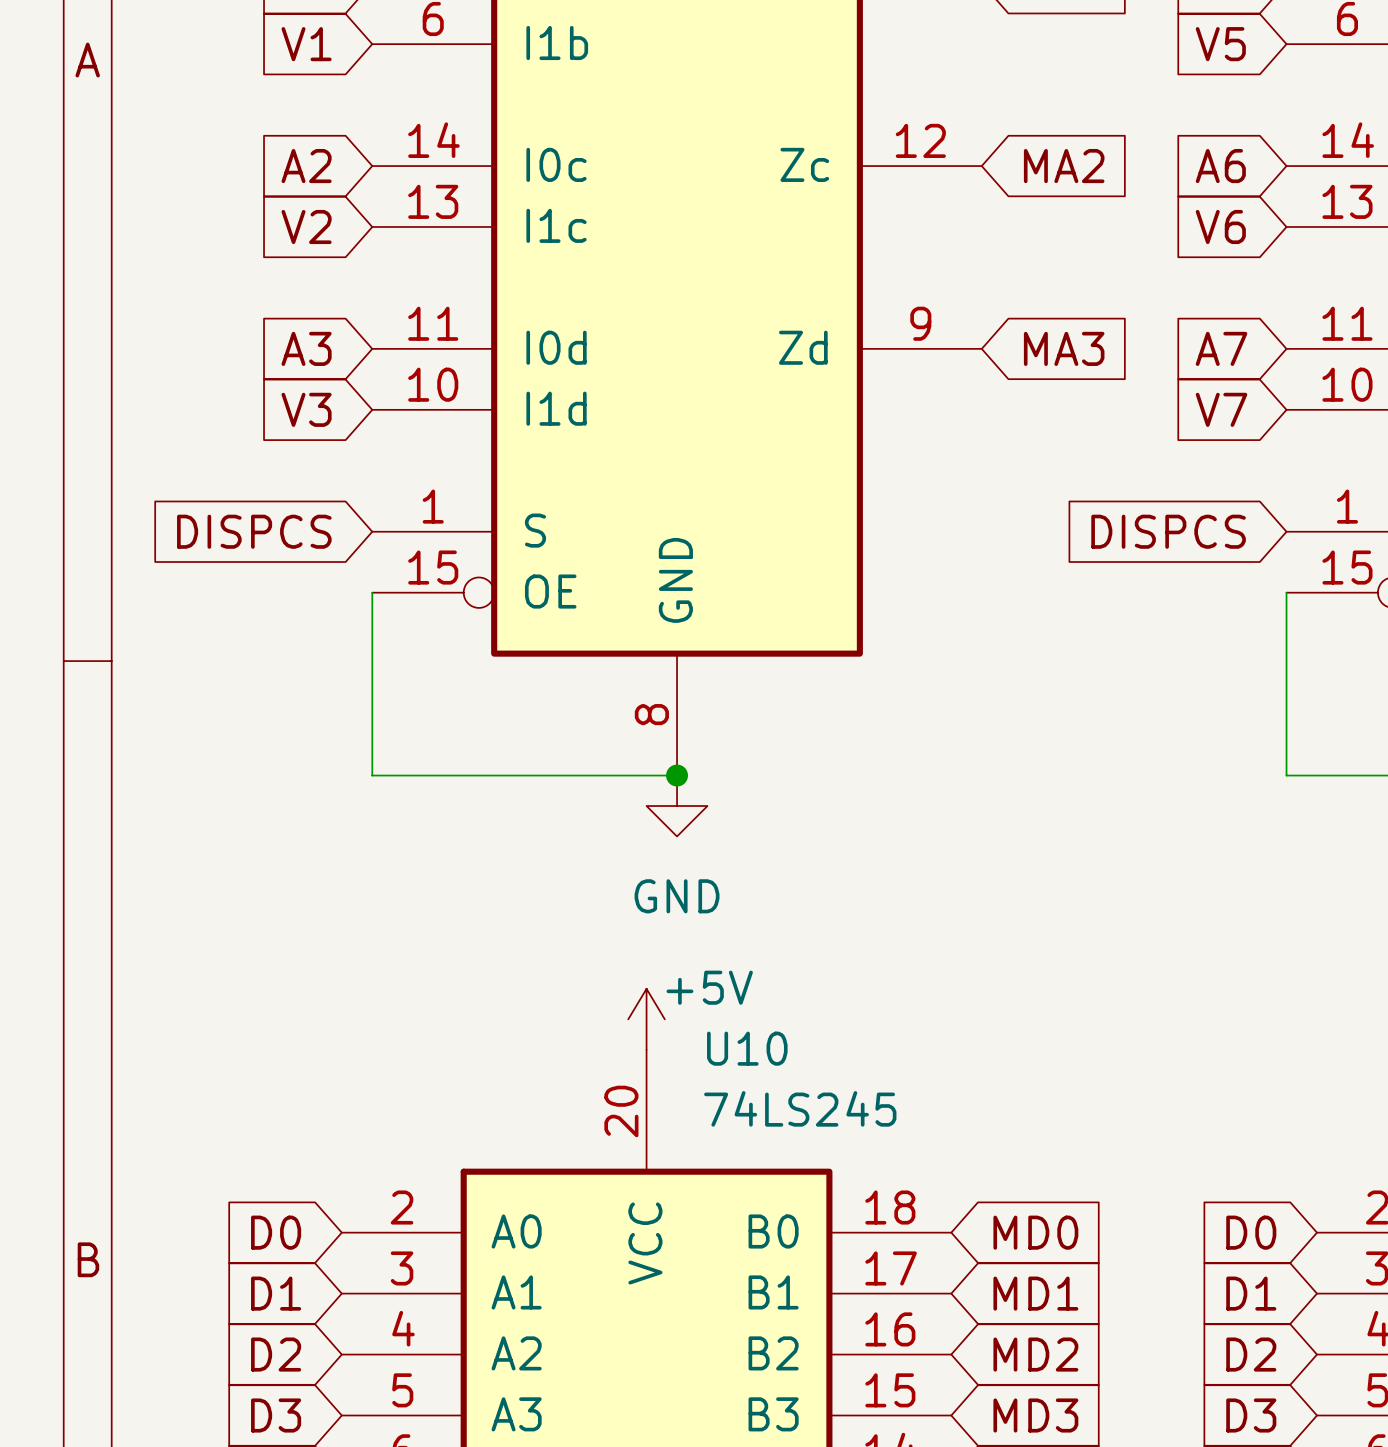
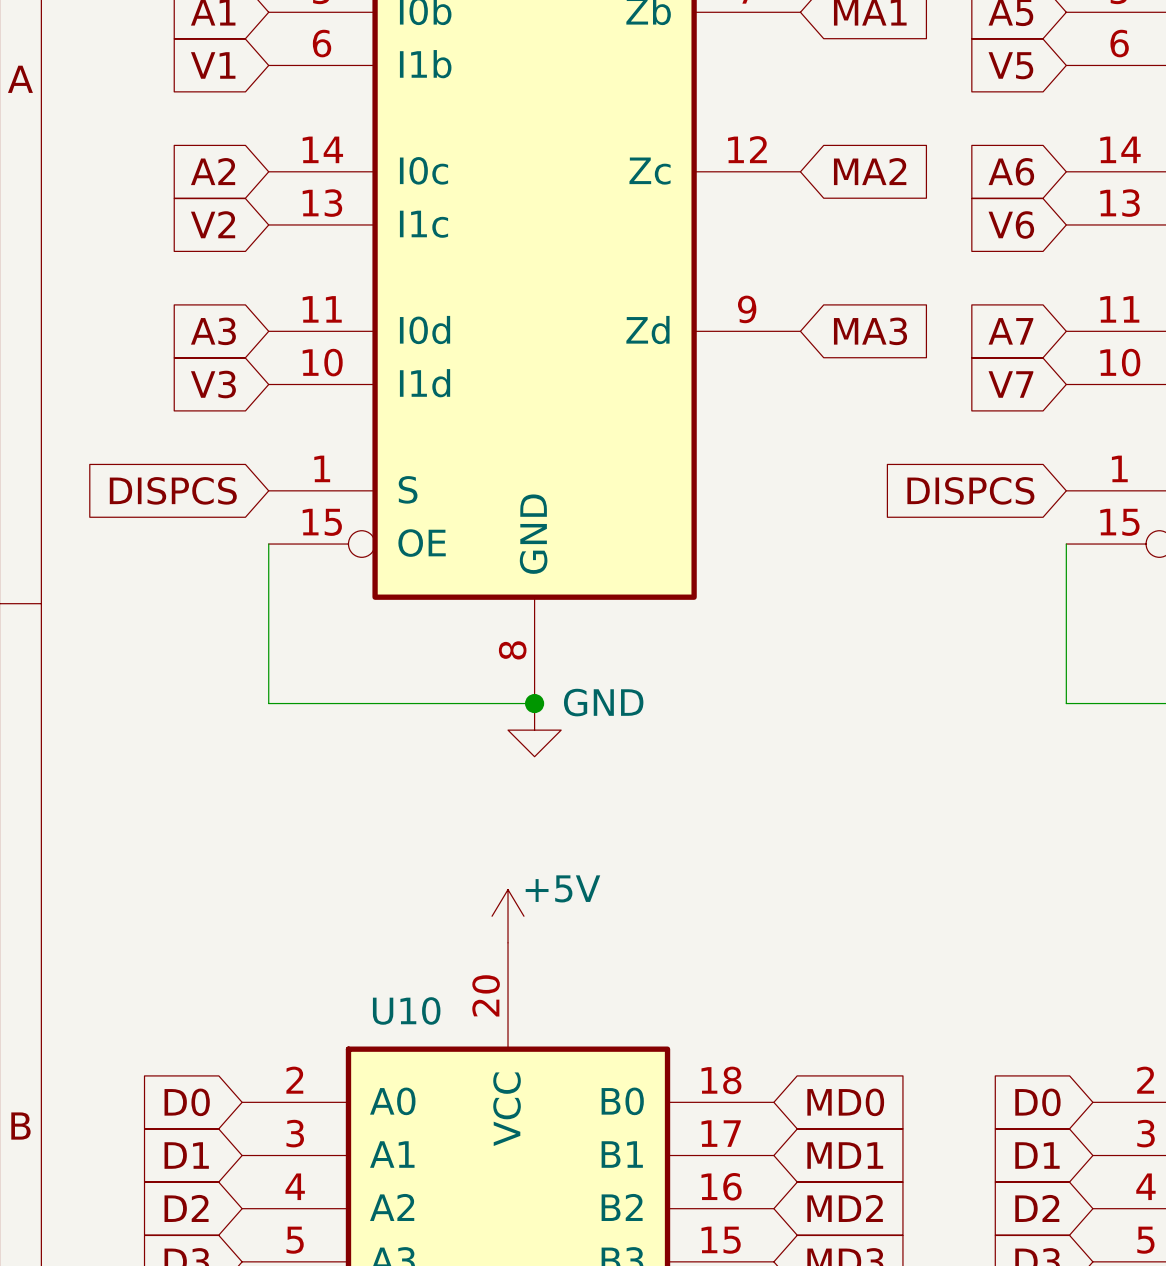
power symbol text position: GND (677, 896) -> GND (603, 702)
U10 name position: U10 (747, 1048) -> U10 (406, 1010)
U10 value: 74LS245 (800, 1108) -> none

